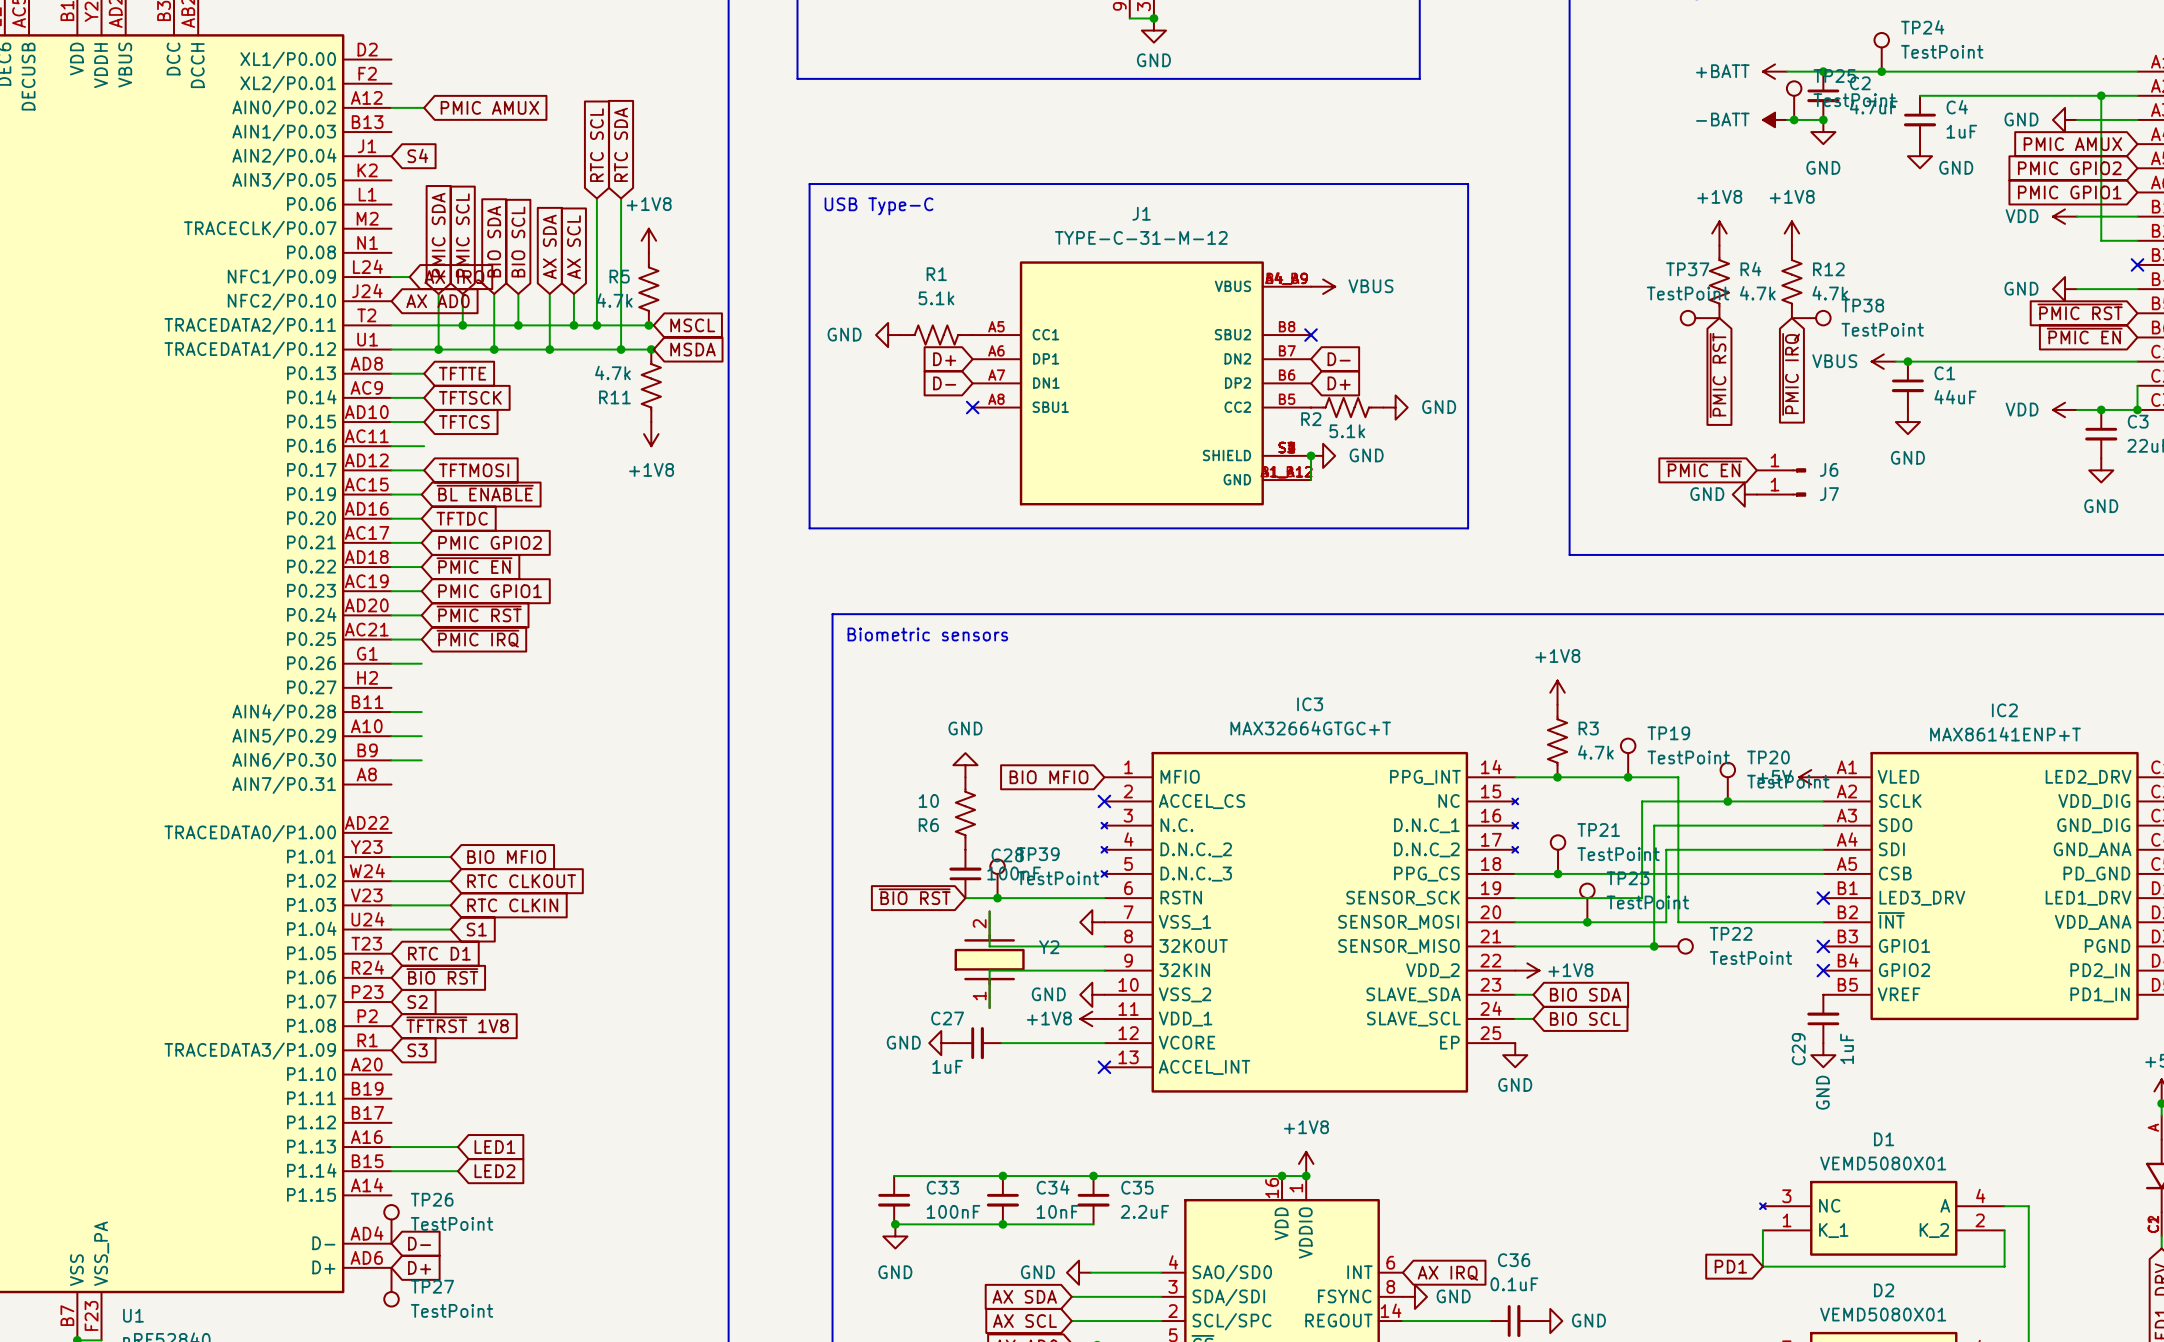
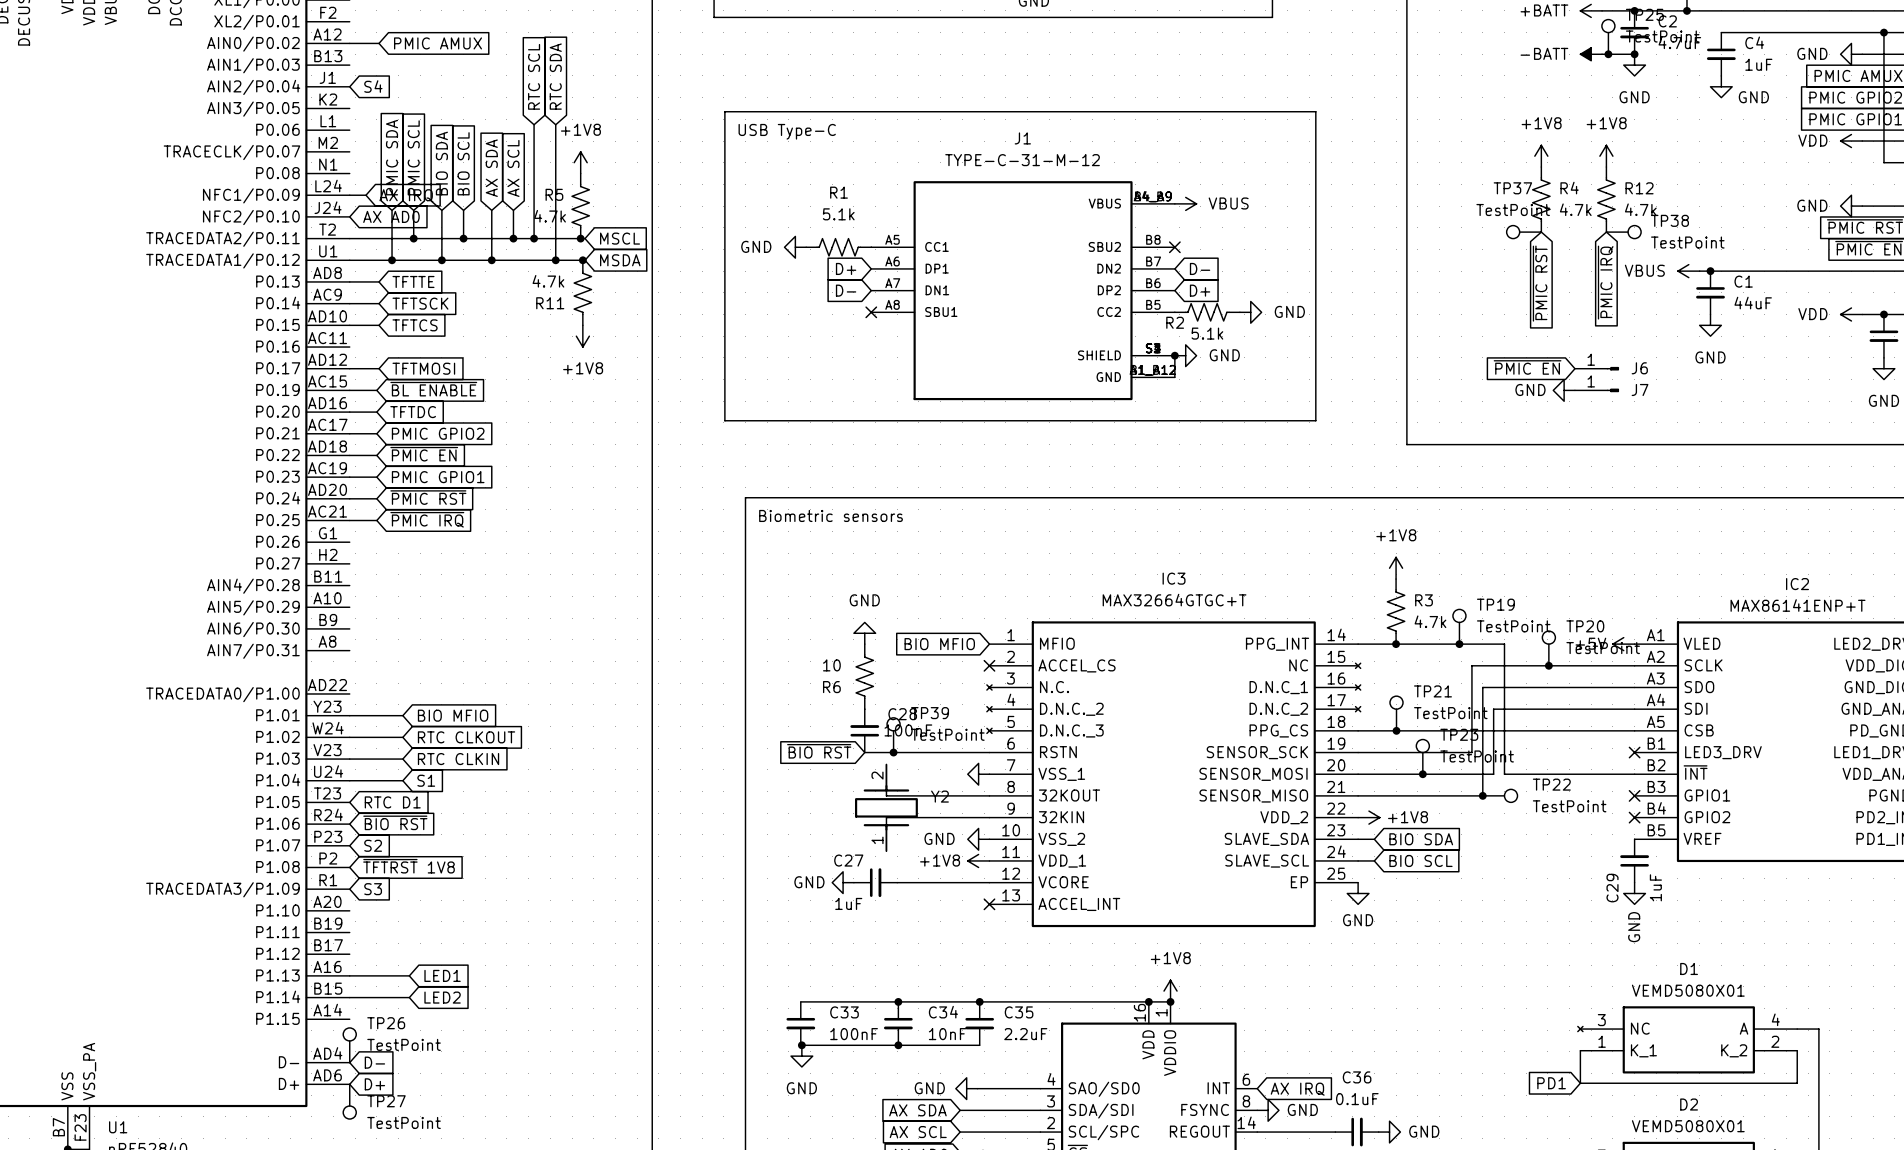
wire: (391, 446) (424, 446) -> none
wire: (391, 663) (421, 663) -> none
wire: (391, 712) (421, 712) -> none
wire: (391, 736) (421, 736) -> none
wire: (391, 760) (421, 760) -> none

